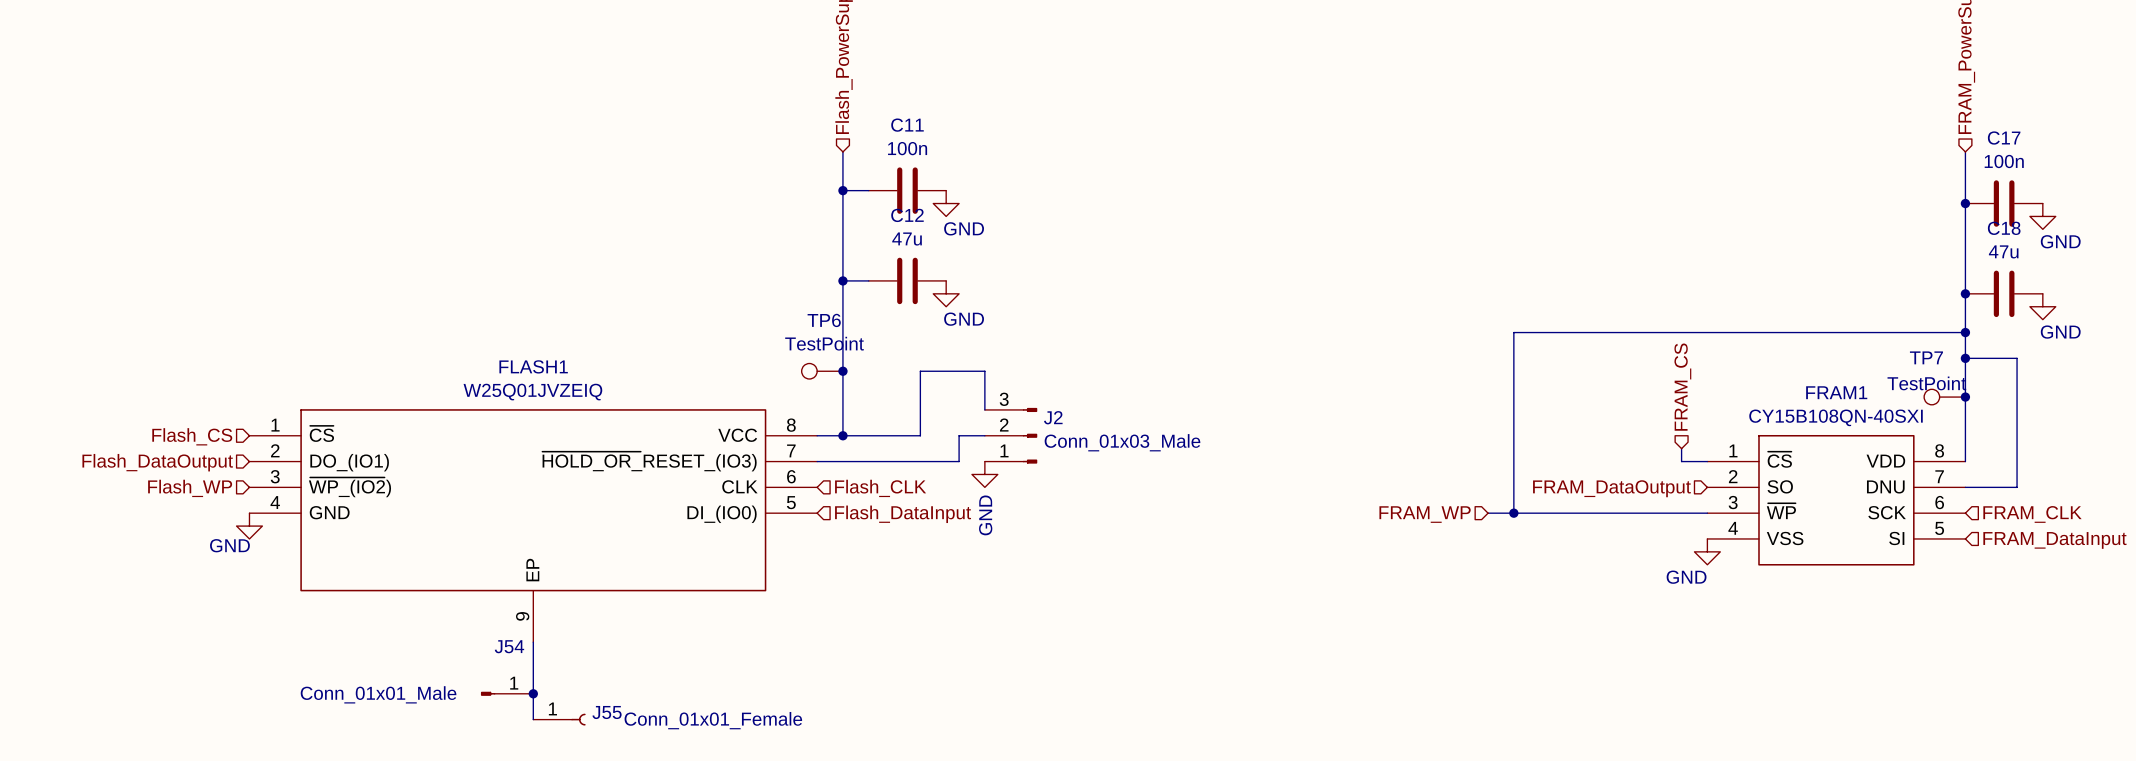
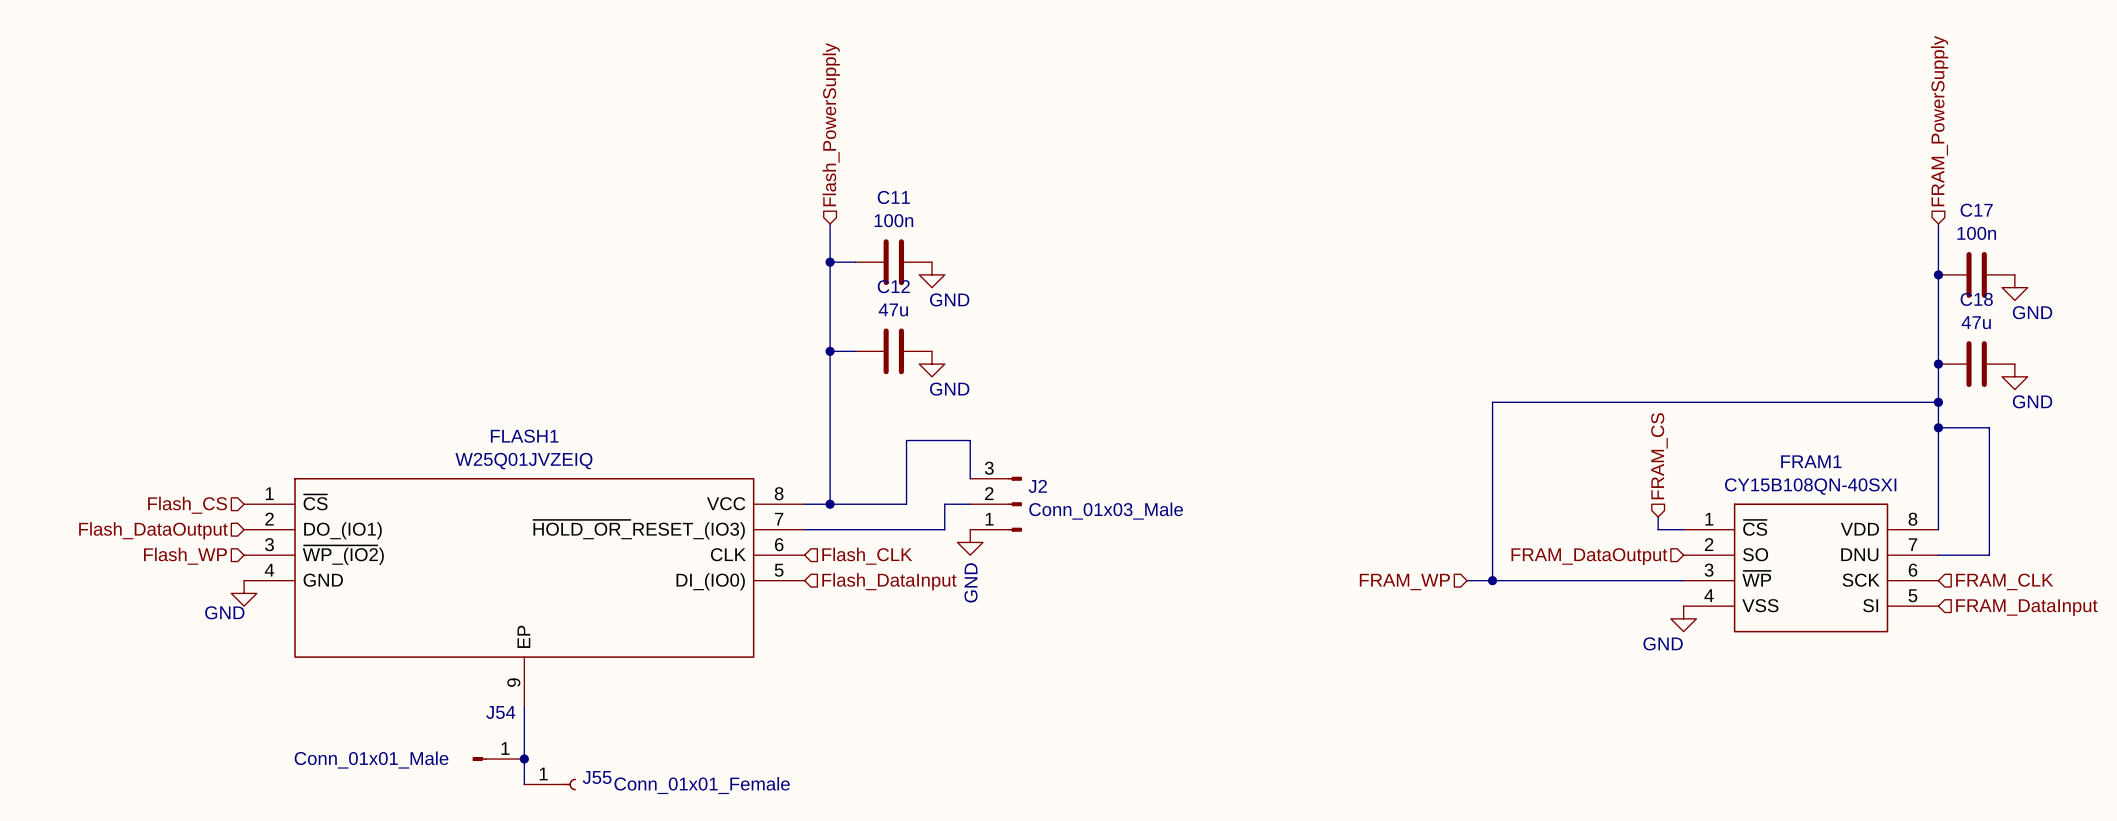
TP6: TestPoint (822, 371) -> none
junction: (842, 371) -> none
TP7: TestPoint (1944, 397) -> none
junction: (1965, 397) -> none

